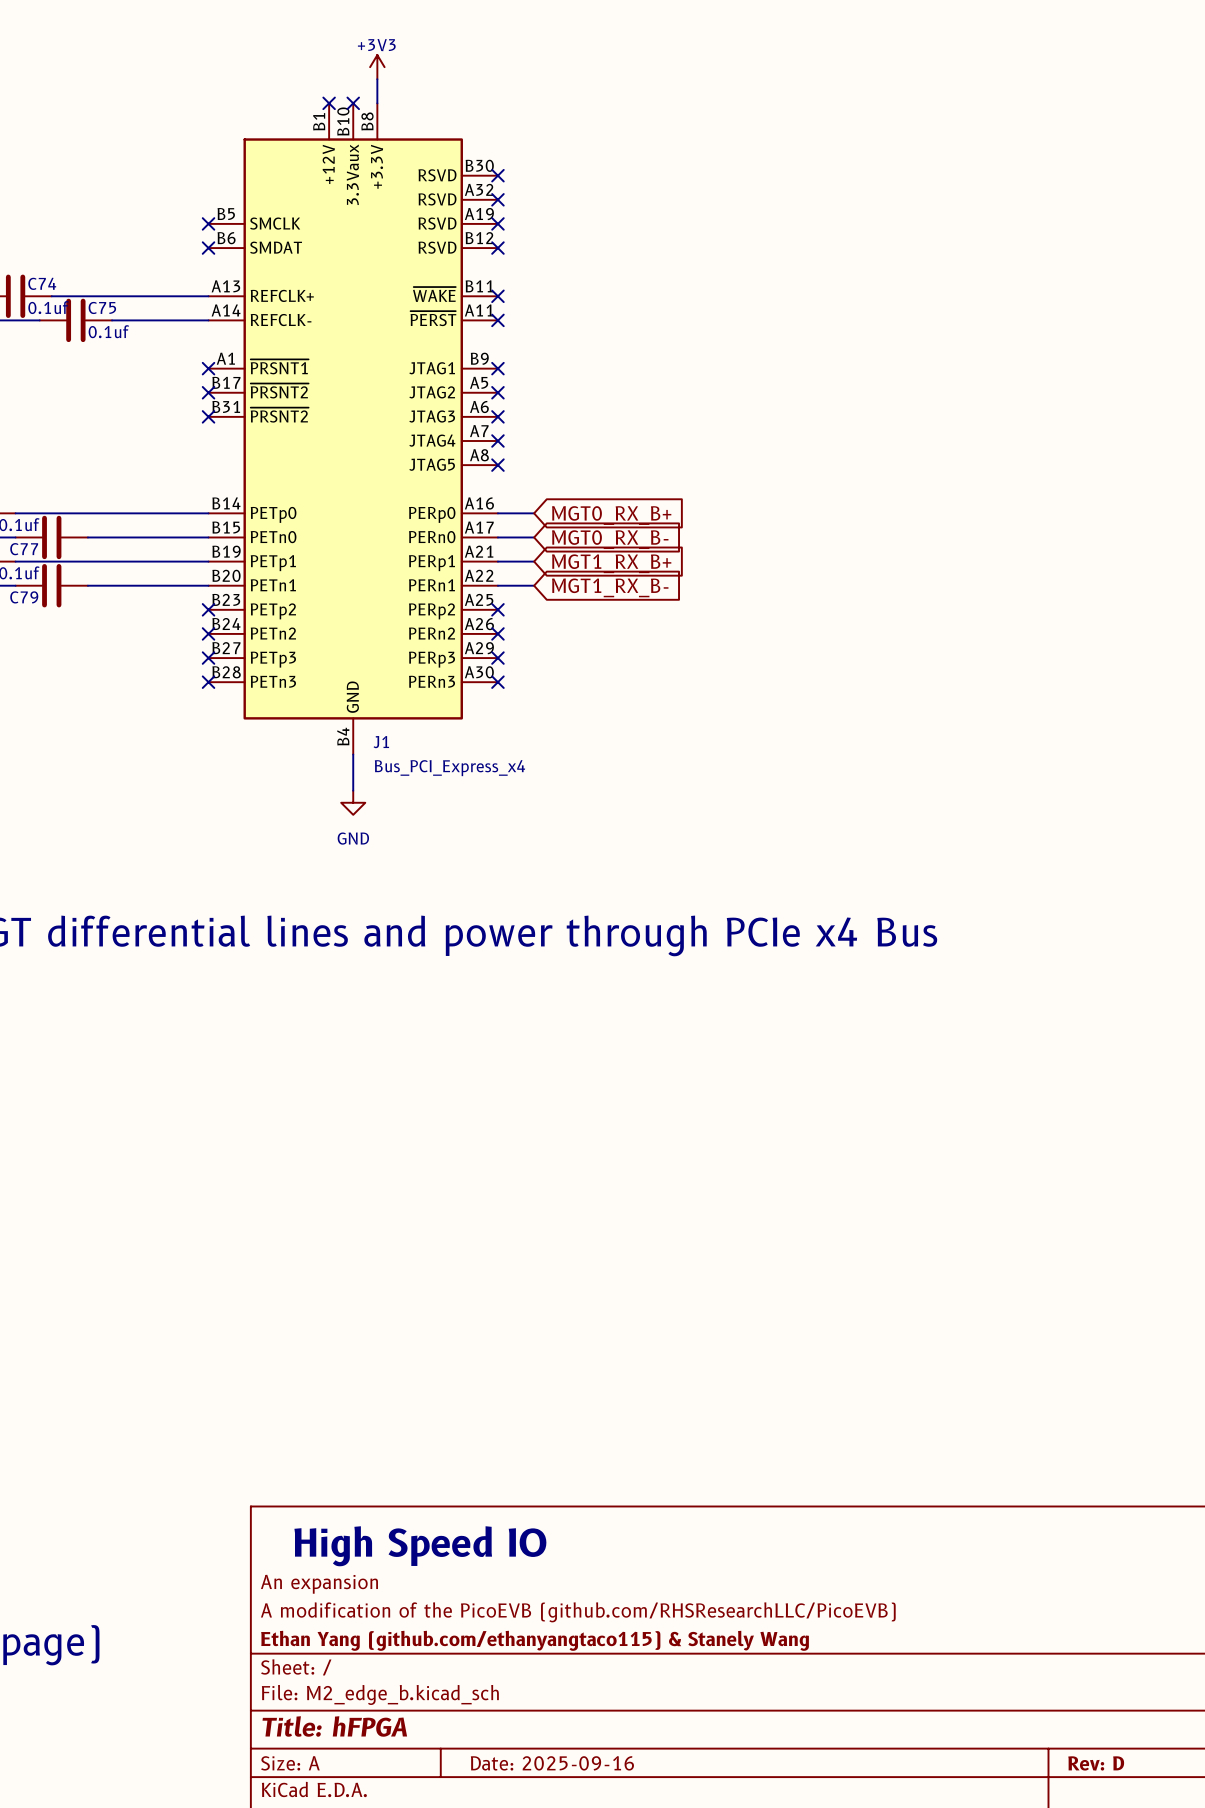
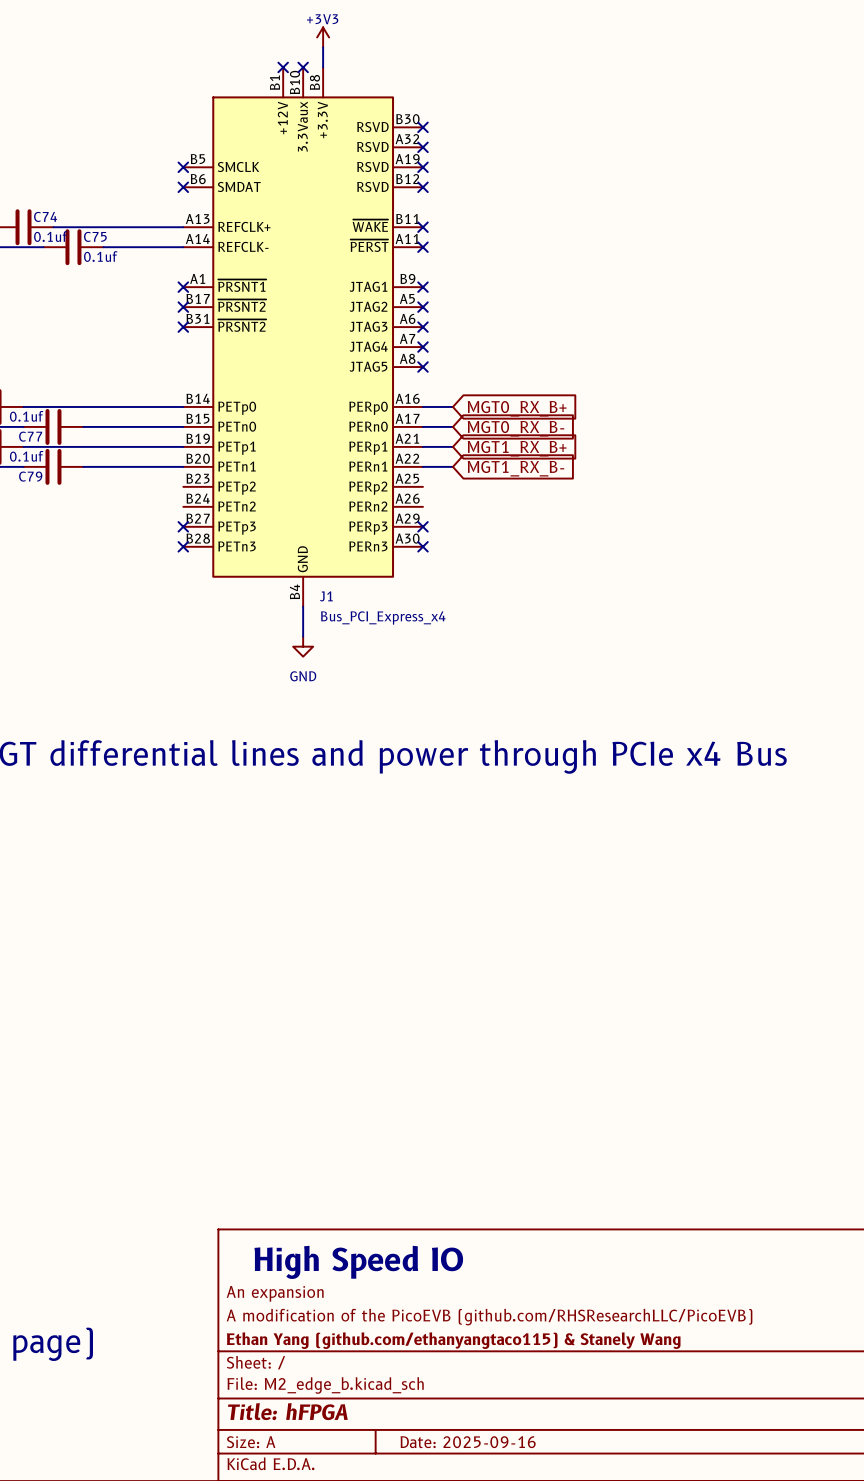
no-connect mark: (208, 609) -> none
no-connect mark: (497, 609) -> none
no-connect mark: (208, 633) -> none
no-connect mark: (497, 633) -> none

